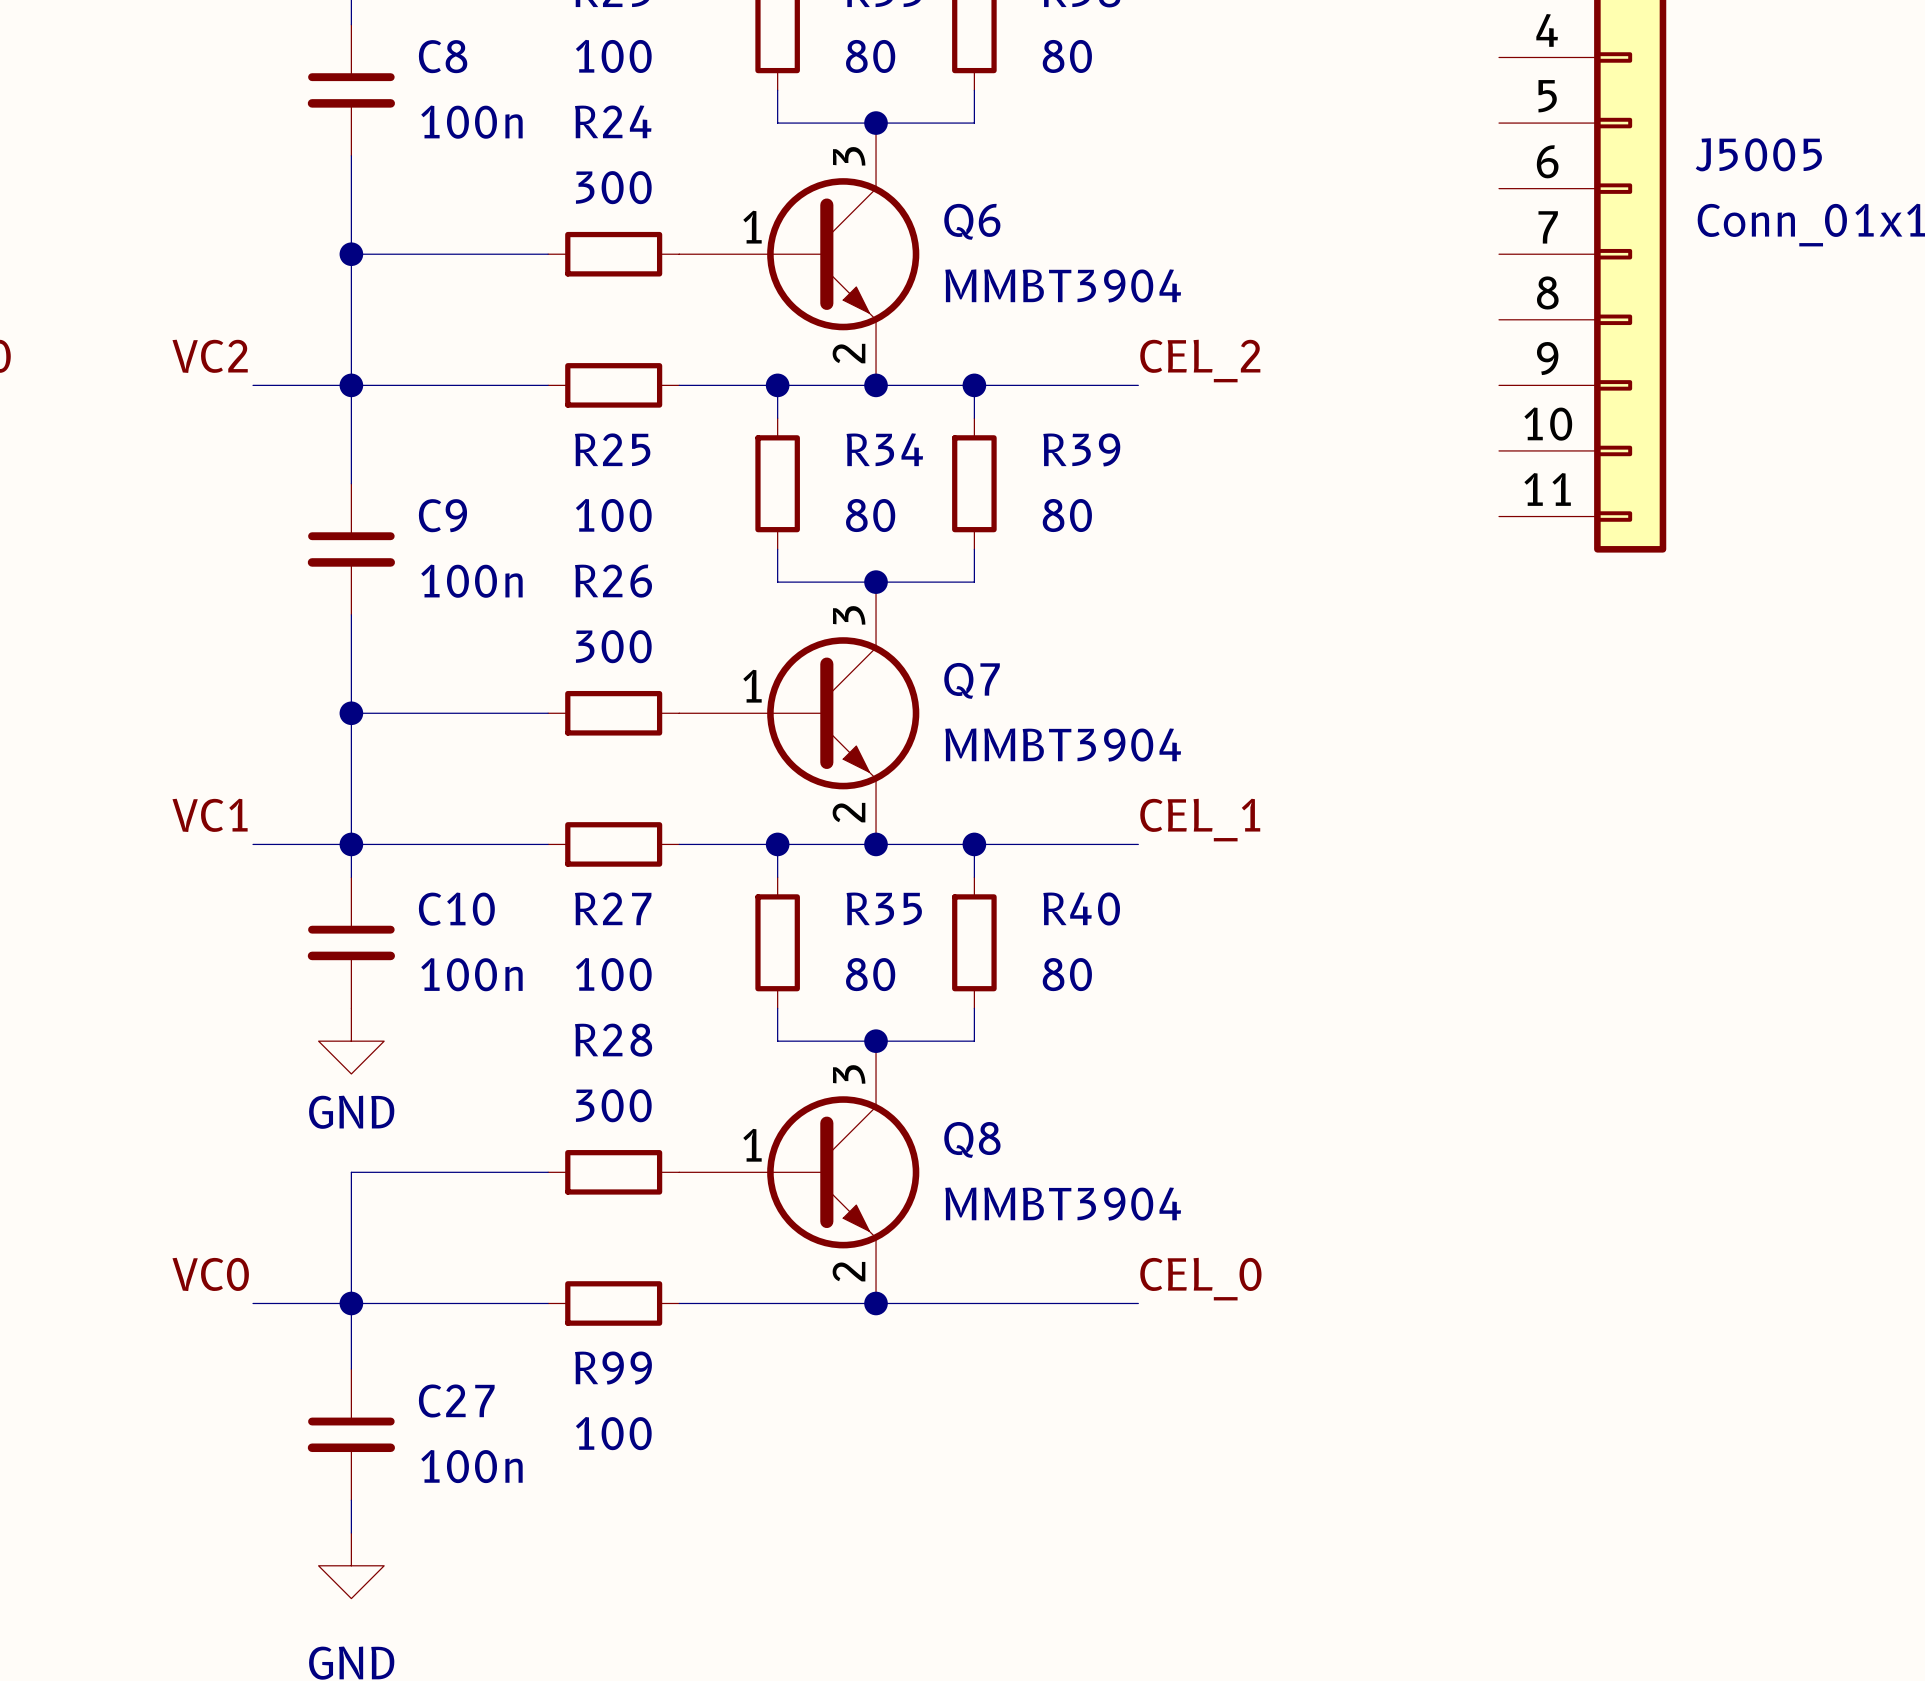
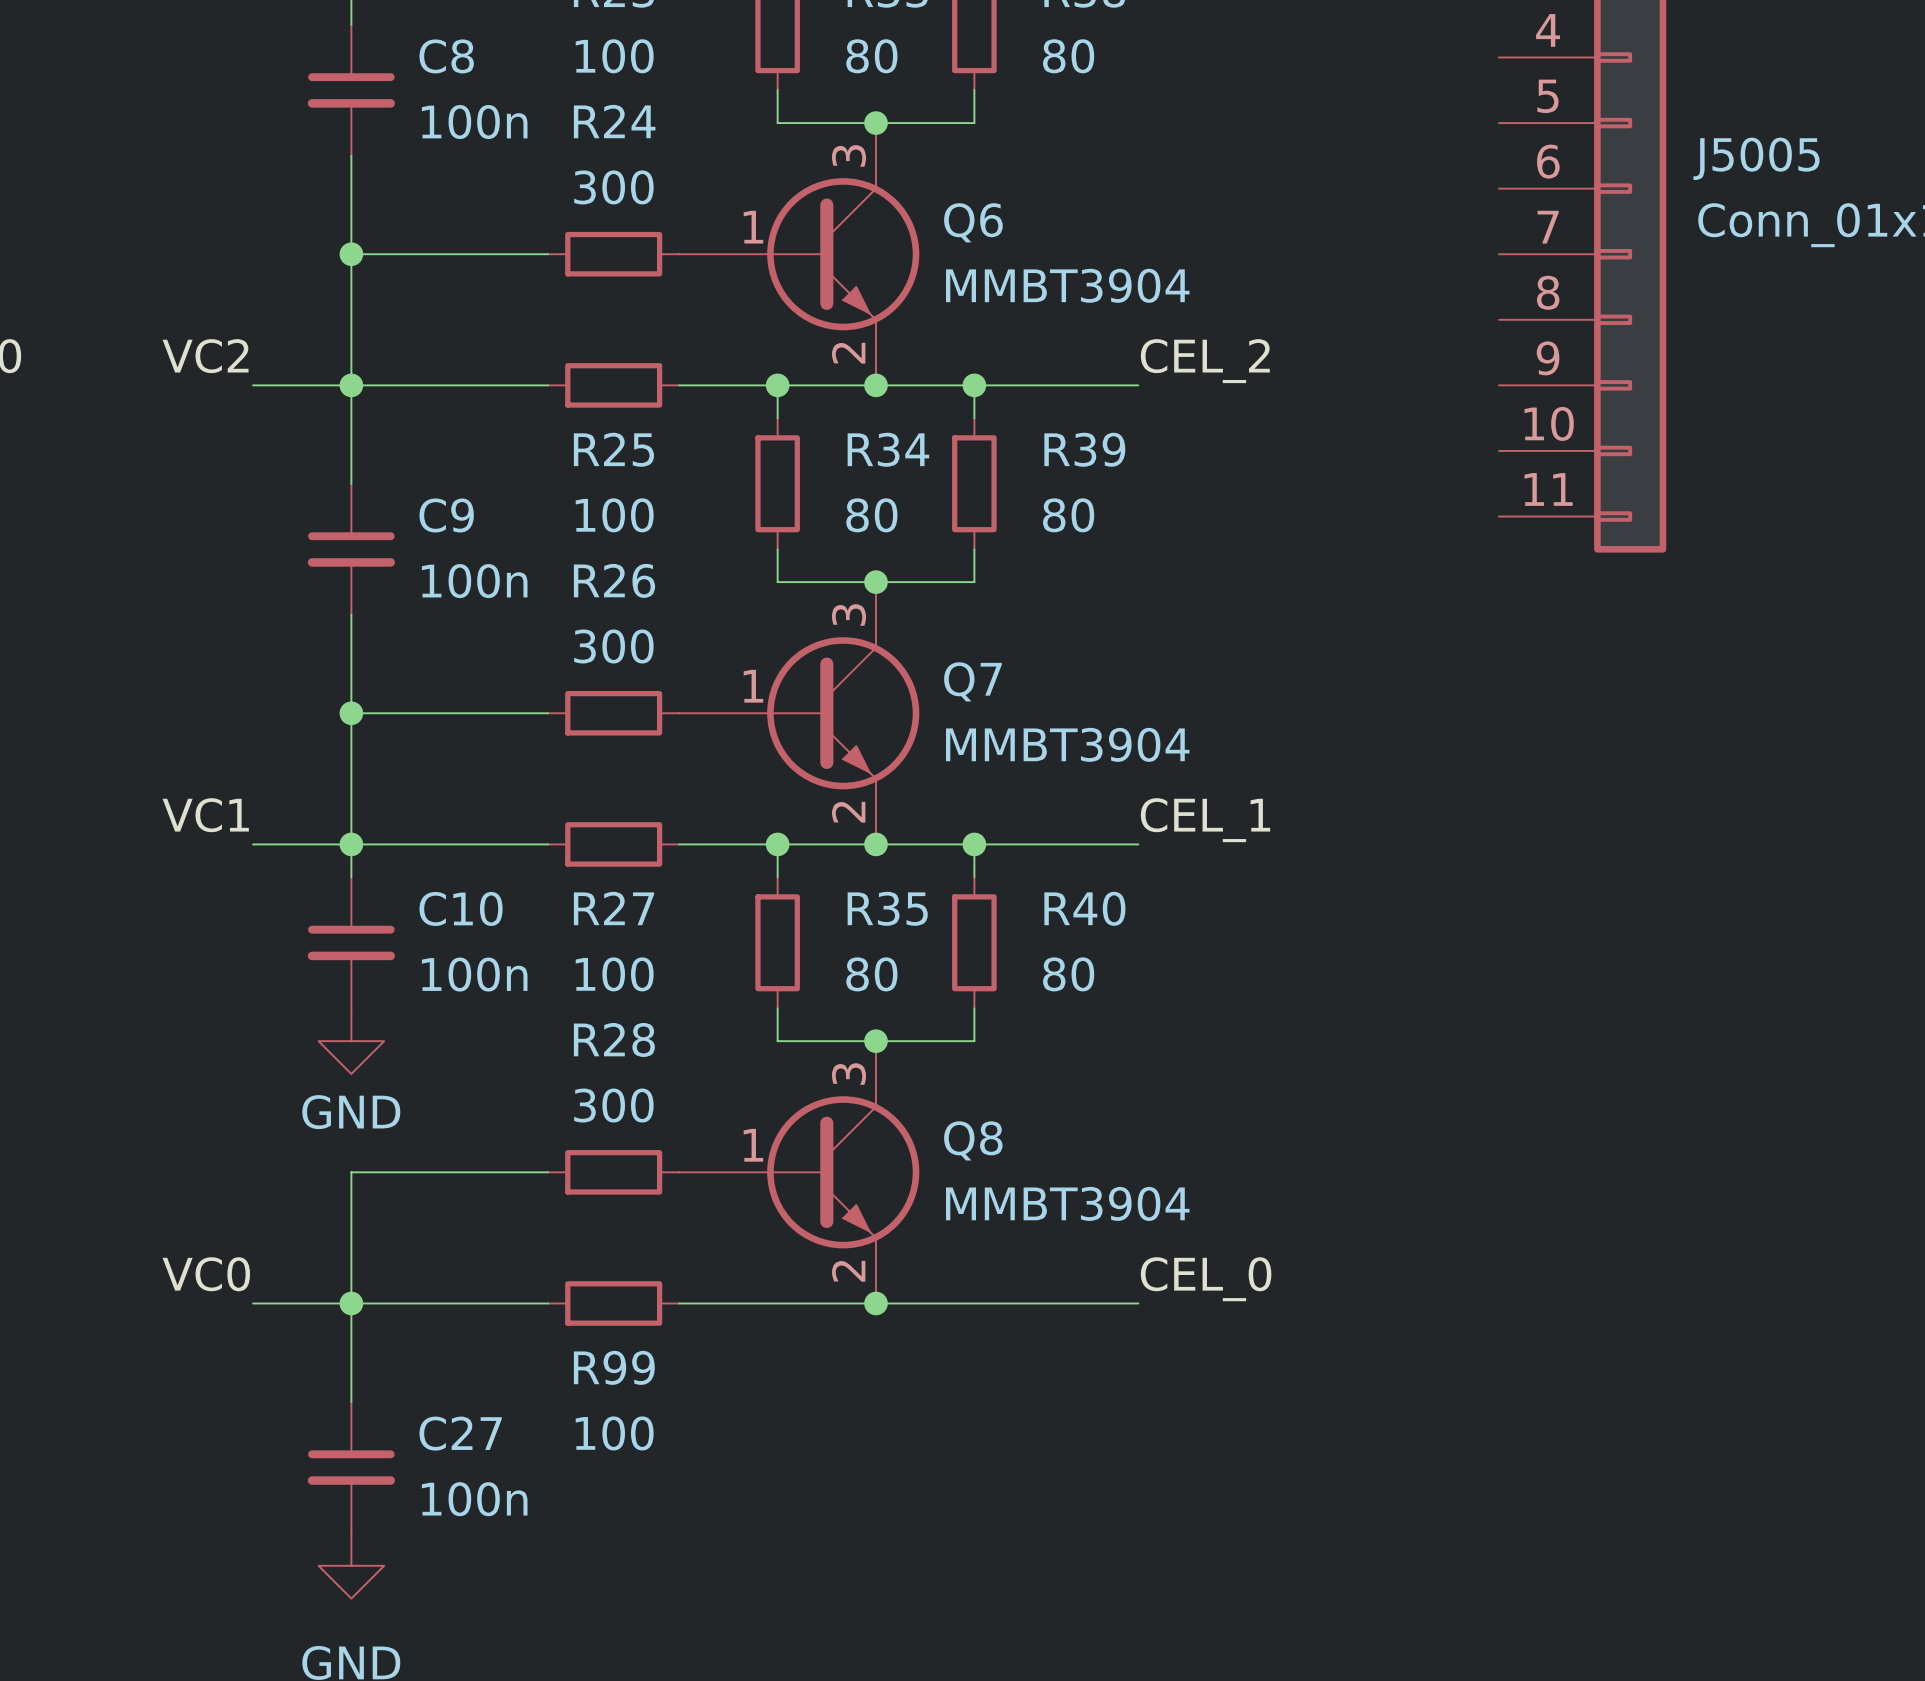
C27 position: (351, 1434) -> (351, 1467)

